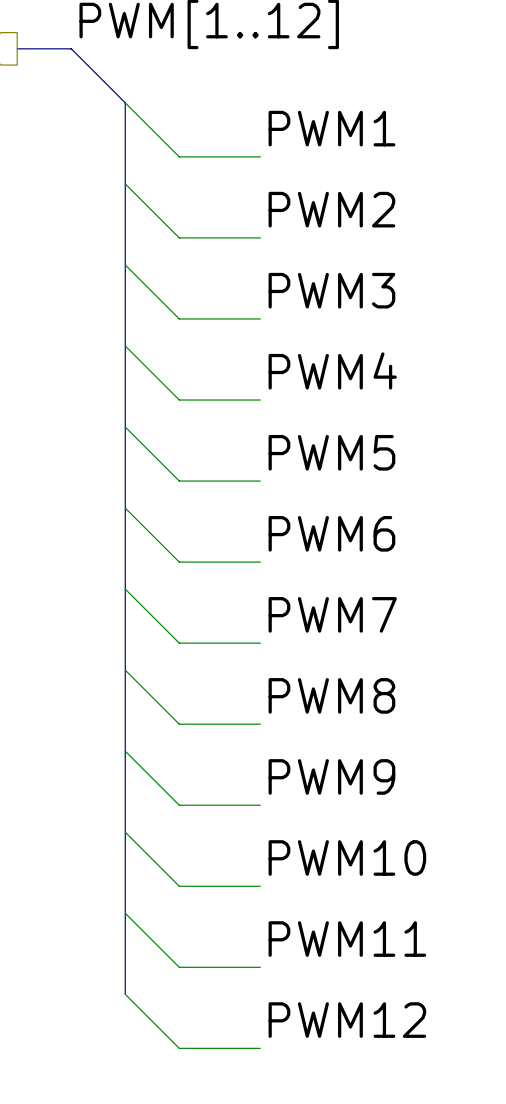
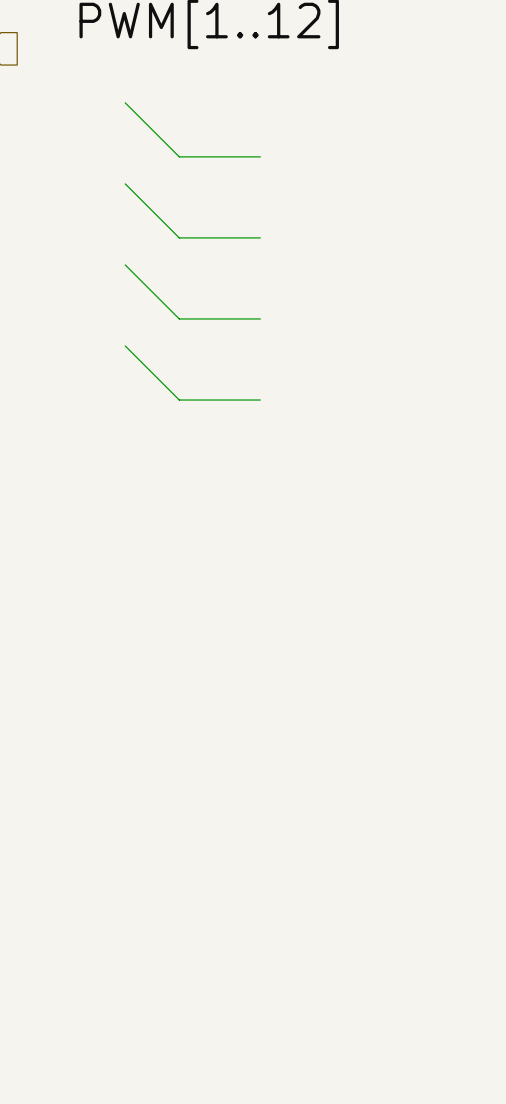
bus: (17, 48) (71, 48) (125, 102) (125, 994) -> none
label: PWM1 (331, 128) -> none
label: PWM2 (331, 209) -> none
label: PWM3 (331, 290) -> none
label: PWM4 (332, 370) -> none
wire: (125, 427) (179, 481) (260, 481) -> none
label: PWM5 (331, 452) -> none
wire: (125, 508) (179, 562) (260, 562) -> none
label: PWM6 (331, 533) -> none
wire: (125, 589) (179, 643) (260, 643) -> none
label: PWM7 (332, 614) -> none
wire: (125, 670) (179, 724) (260, 724) -> none
label: PWM8 (331, 695) -> none
wire: (125, 751) (179, 805) (260, 805) -> none
label: PWM9 (331, 776) -> none
wire: (125, 832) (179, 886) (260, 886) -> none
label: PWM10 (347, 857) -> none
wire: (125, 913) (179, 967) (260, 967) -> none
label: PWM11 (347, 939) -> none
wire: (125, 994) (179, 1048) (260, 1048) -> none
label: PWM12 (347, 1020) -> none

